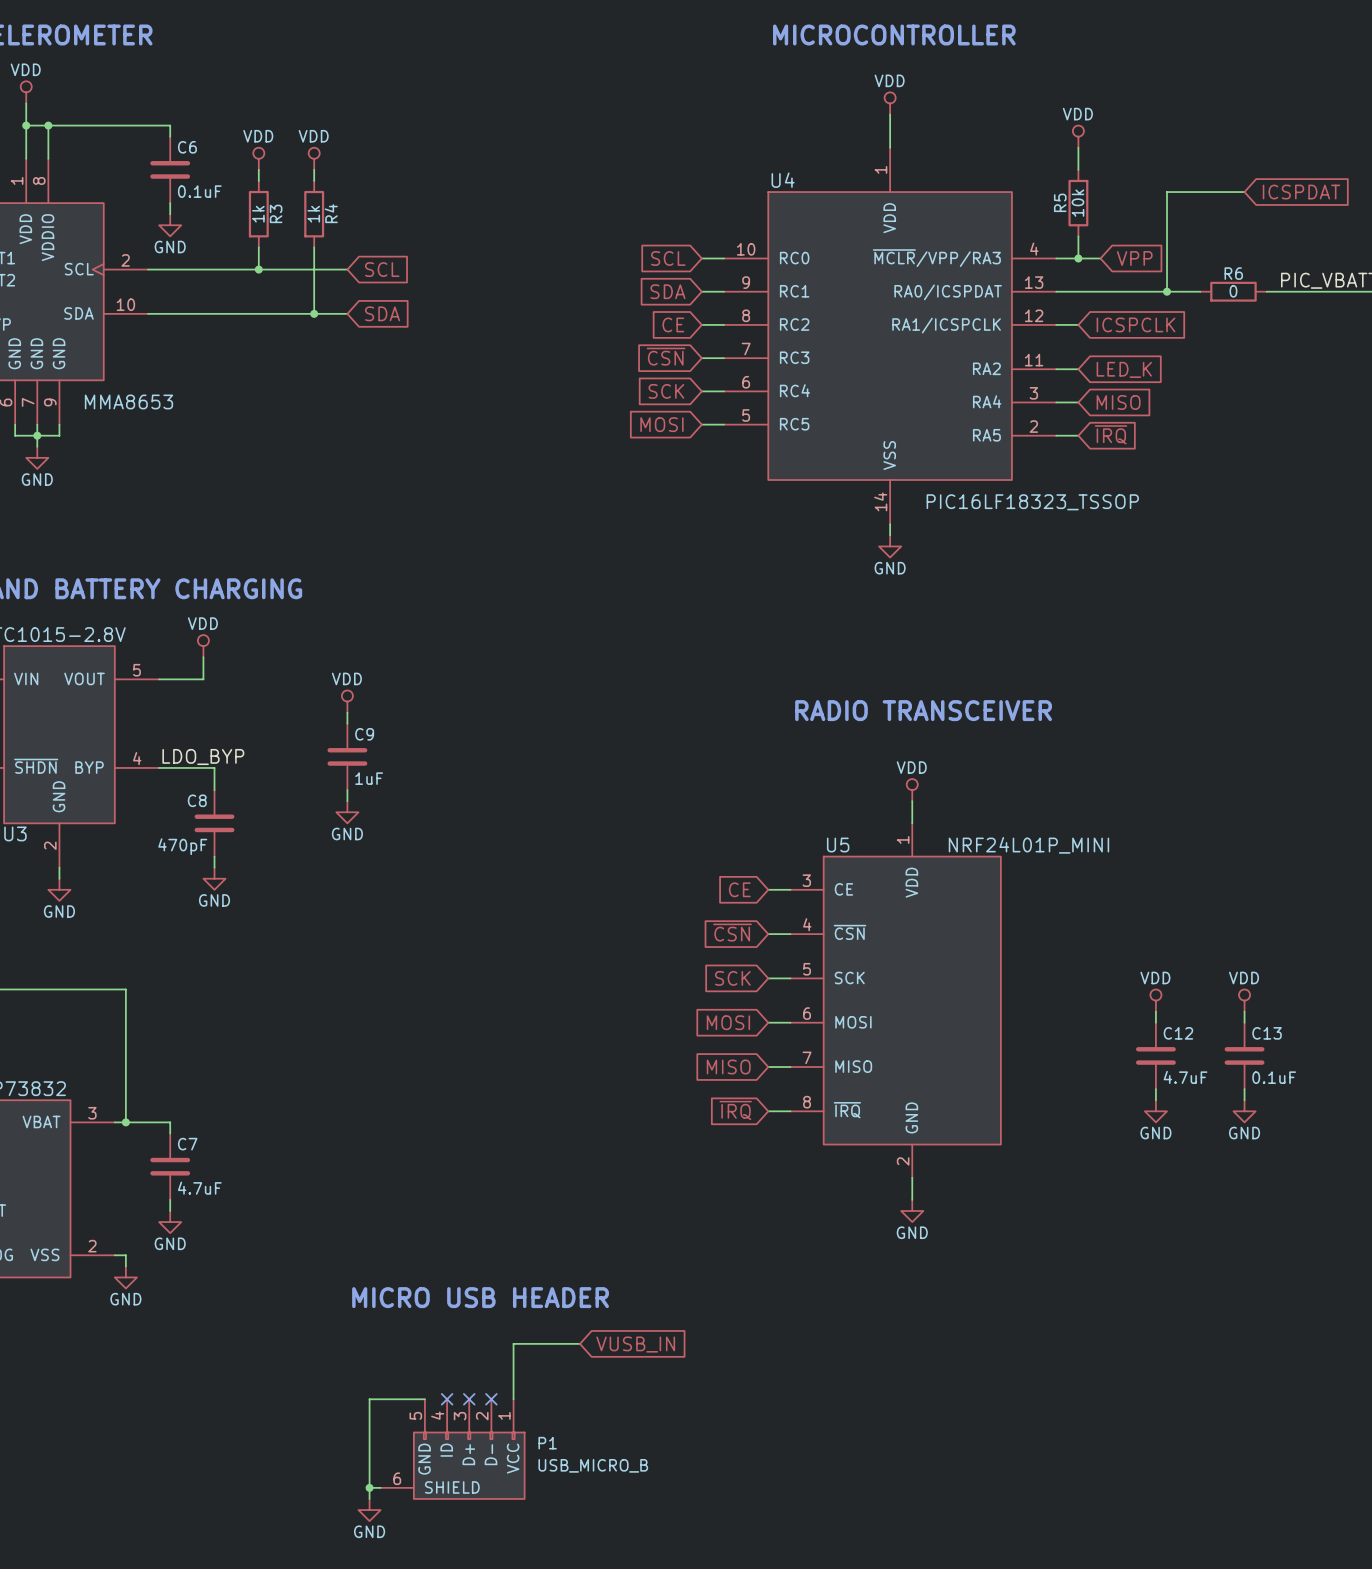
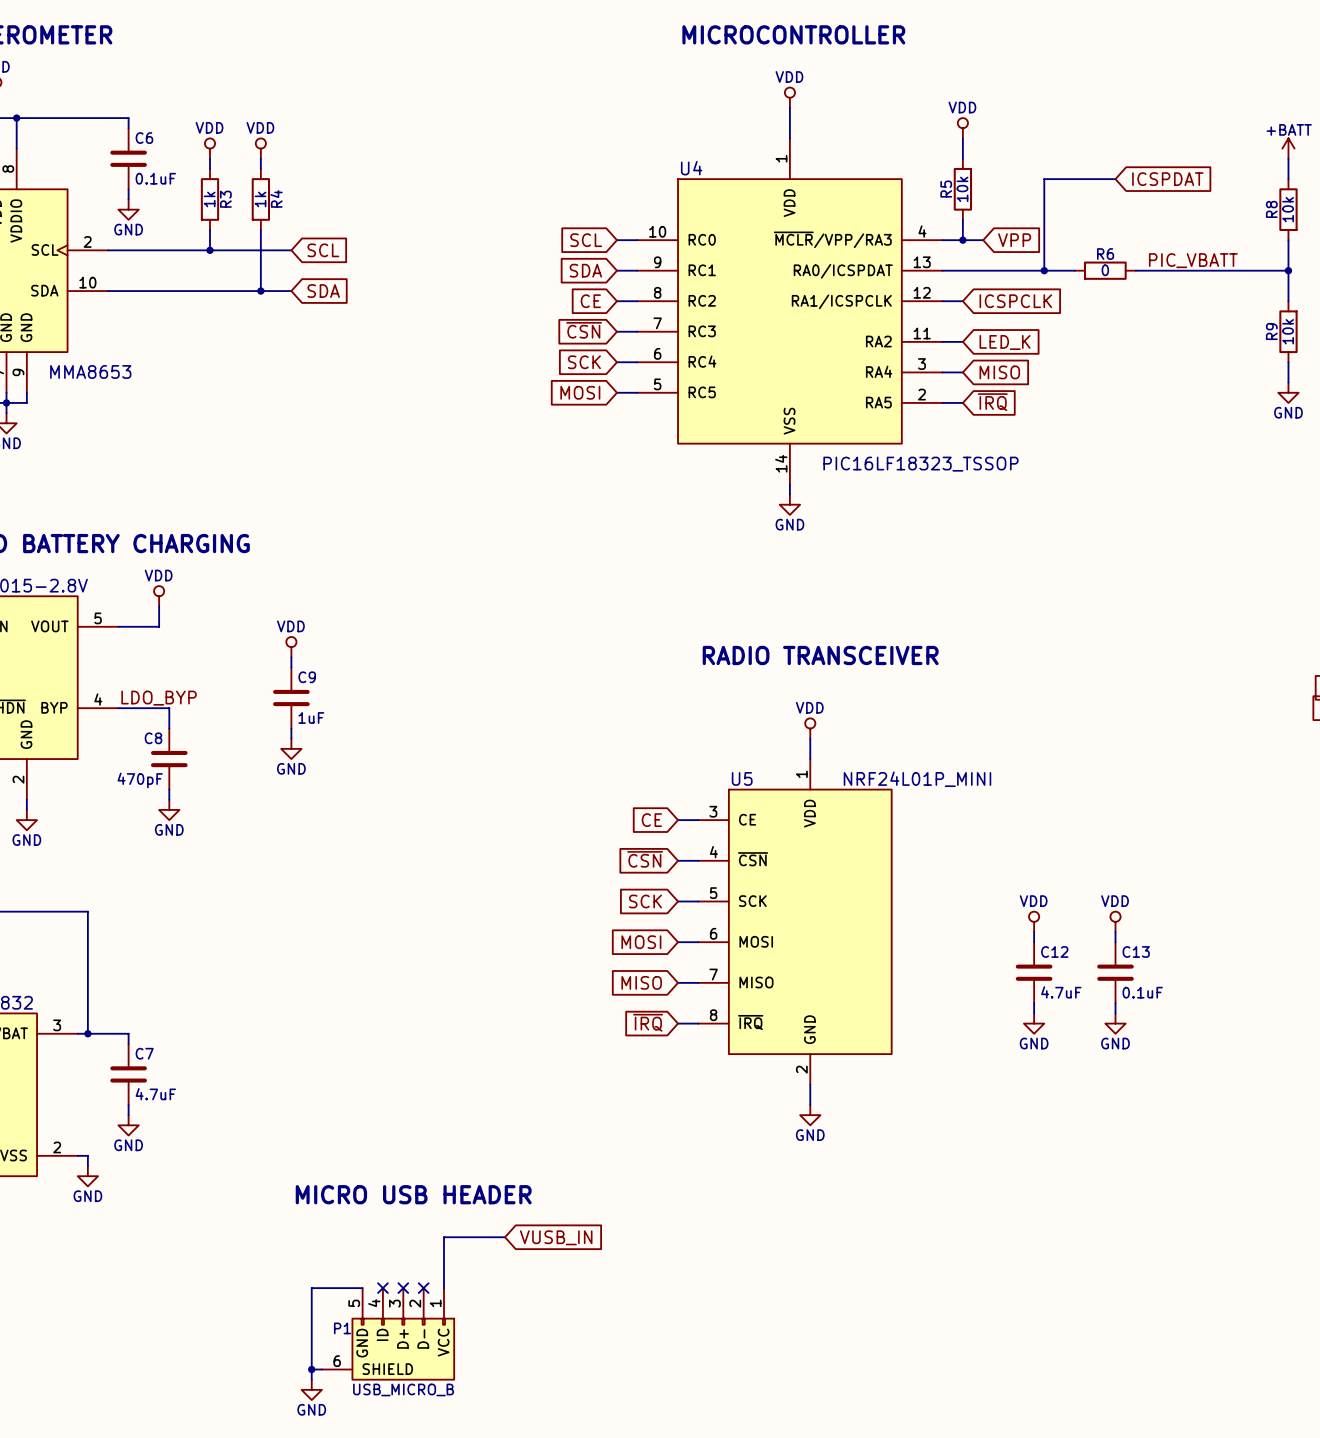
P1 name position: P1 (547, 1443) -> P1 (342, 1328)
P1 value position: USB_MICRO_B (593, 1465) -> USB_MICRO_B (403, 1389)

